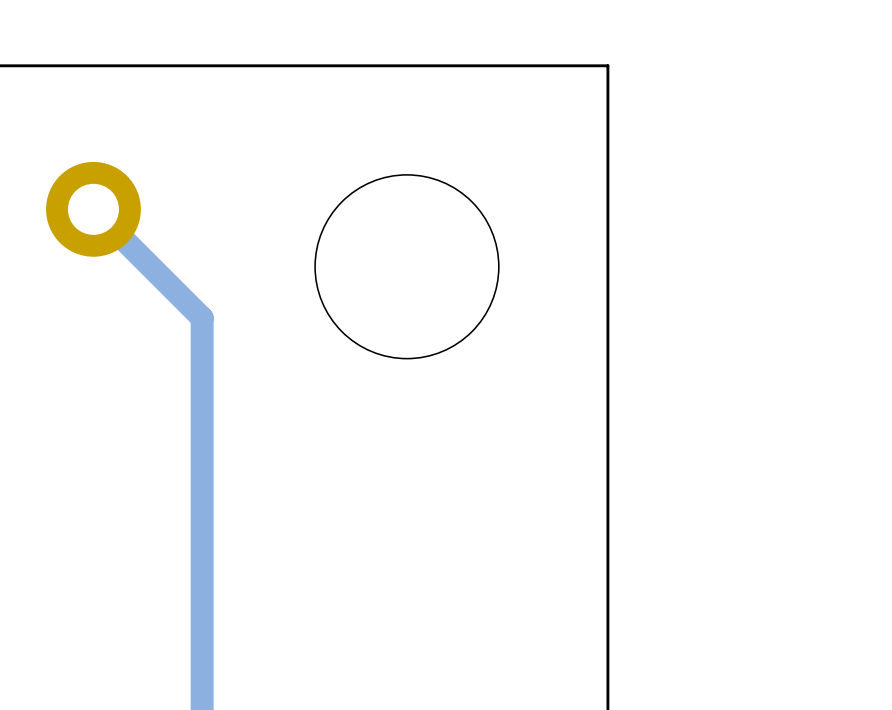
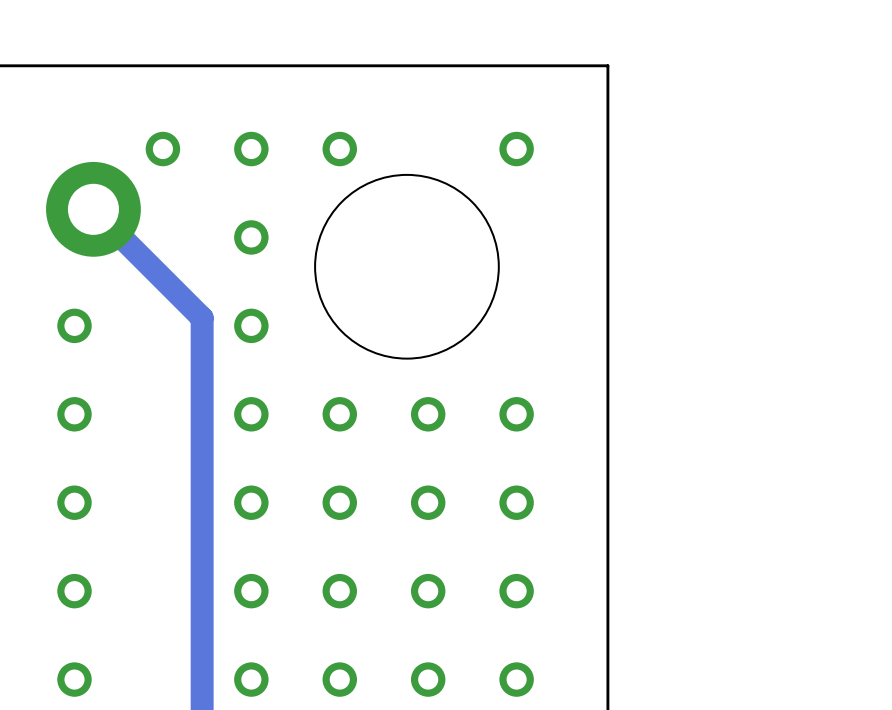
via: none -> (162, 149)
via: none -> (251, 149)
via: none -> (339, 149)
via: none -> (516, 149)
via: none -> (251, 237)
via: none -> (74, 325)
via: none -> (251, 325)
via: none -> (74, 414)
via: none -> (251, 414)
via: none -> (339, 414)
via: none -> (428, 414)
via: none -> (516, 414)
via: none -> (74, 502)
via: none -> (251, 502)
via: none -> (339, 502)
via: none -> (428, 502)
via: none -> (516, 502)
via: none -> (74, 591)
via: none -> (251, 591)
via: none -> (339, 591)
via: none -> (428, 591)
via: none -> (516, 591)
via: none -> (74, 679)
via: none -> (251, 679)
via: none -> (339, 679)
via: none -> (428, 679)
via: none -> (516, 679)

